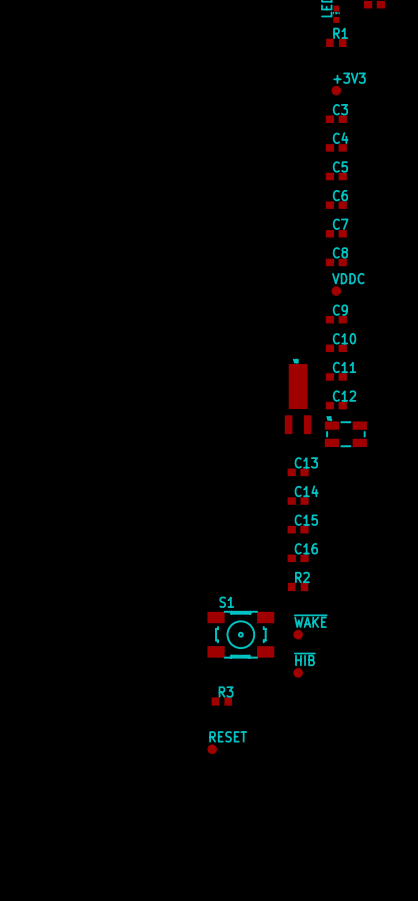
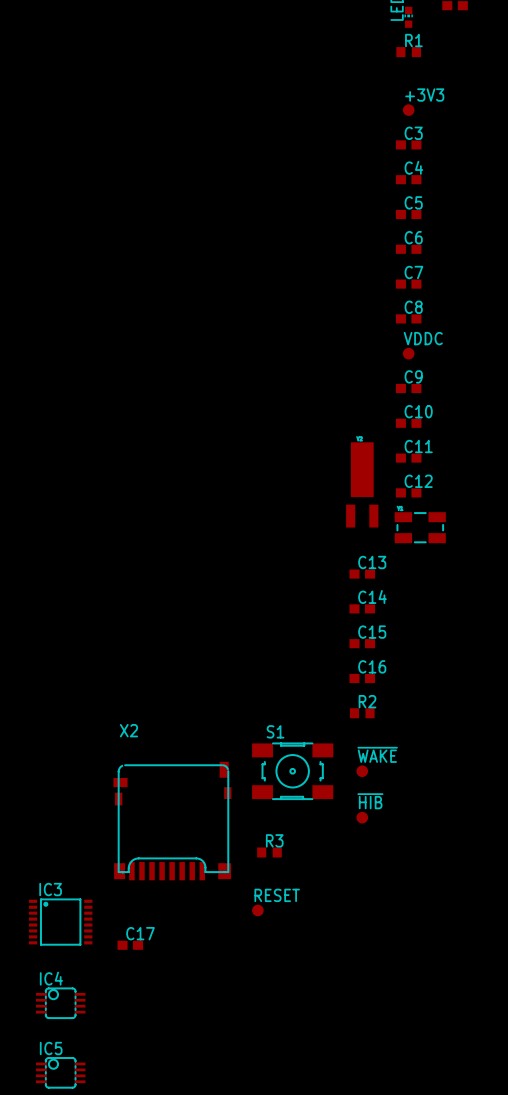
X2: none -> (172, 821)
IC3: none -> (60, 922)
C17: none -> (130, 945)
IC4: none -> (60, 1003)
IC5: none -> (60, 1072)

